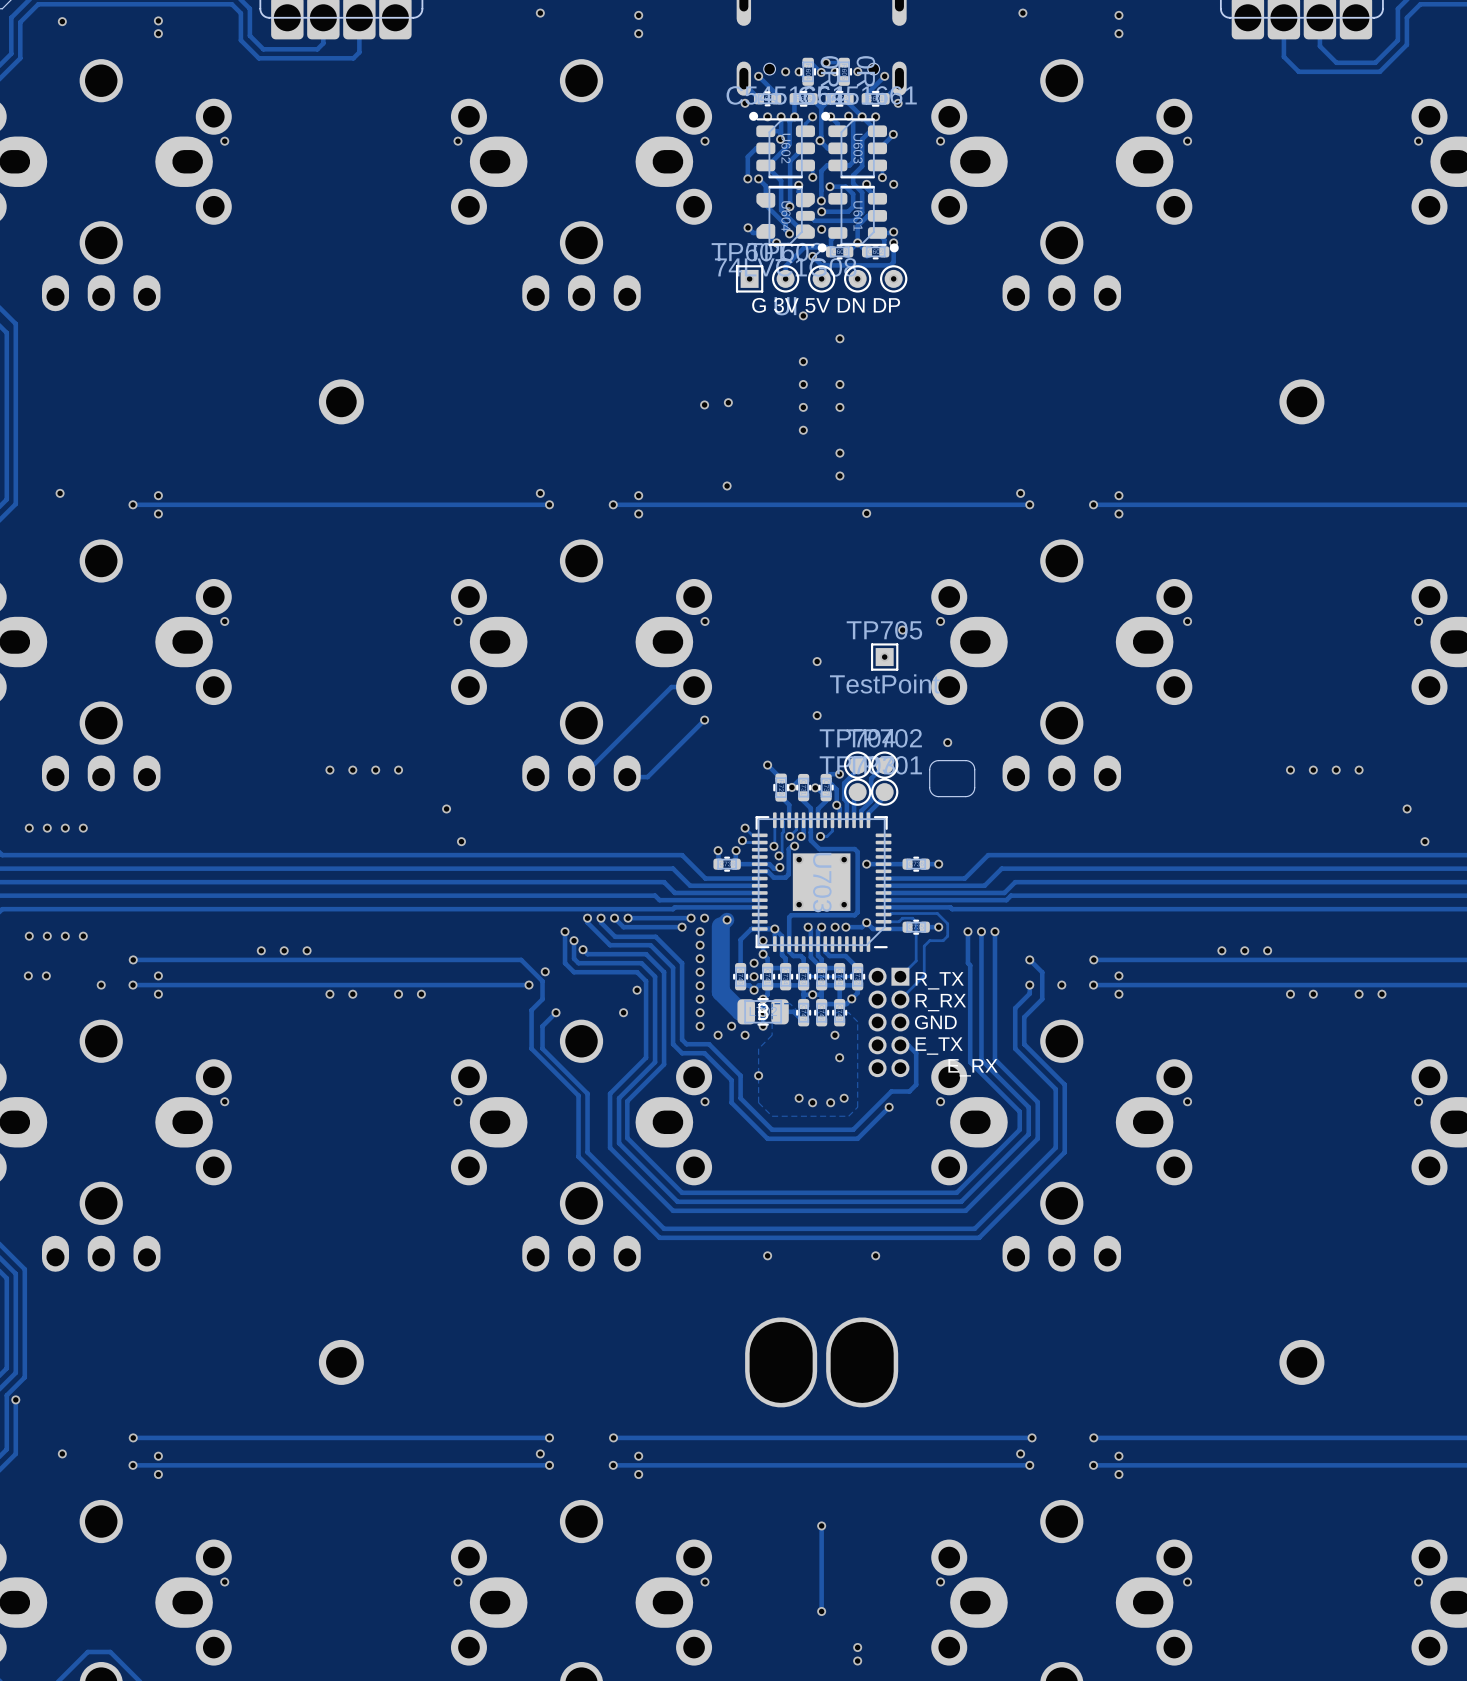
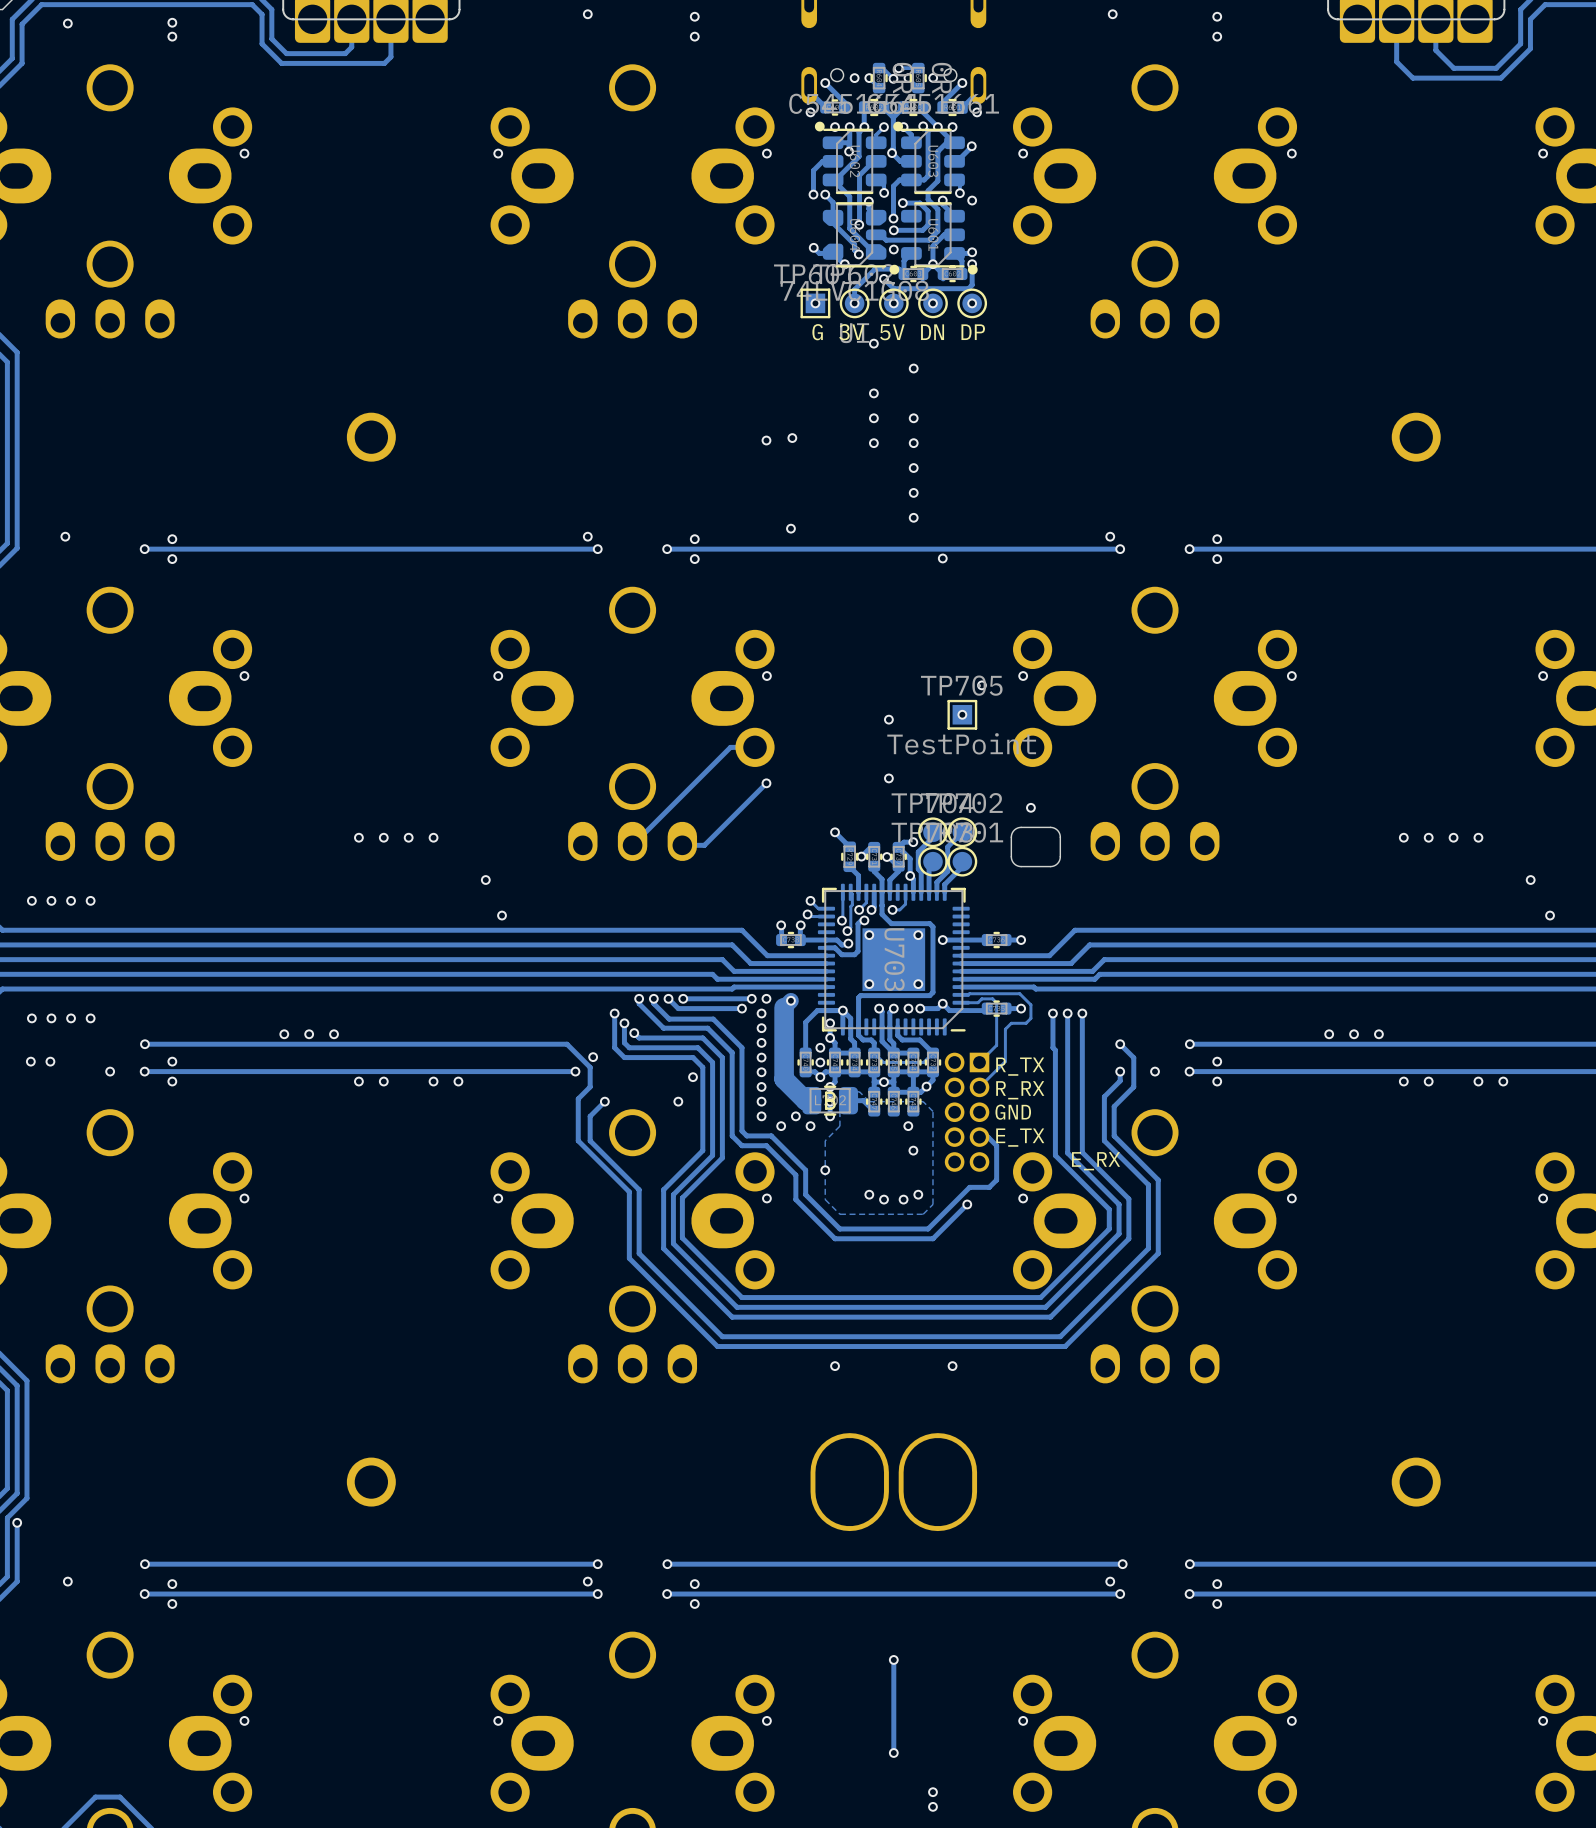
via position: (803, 430) -> (913, 468)

